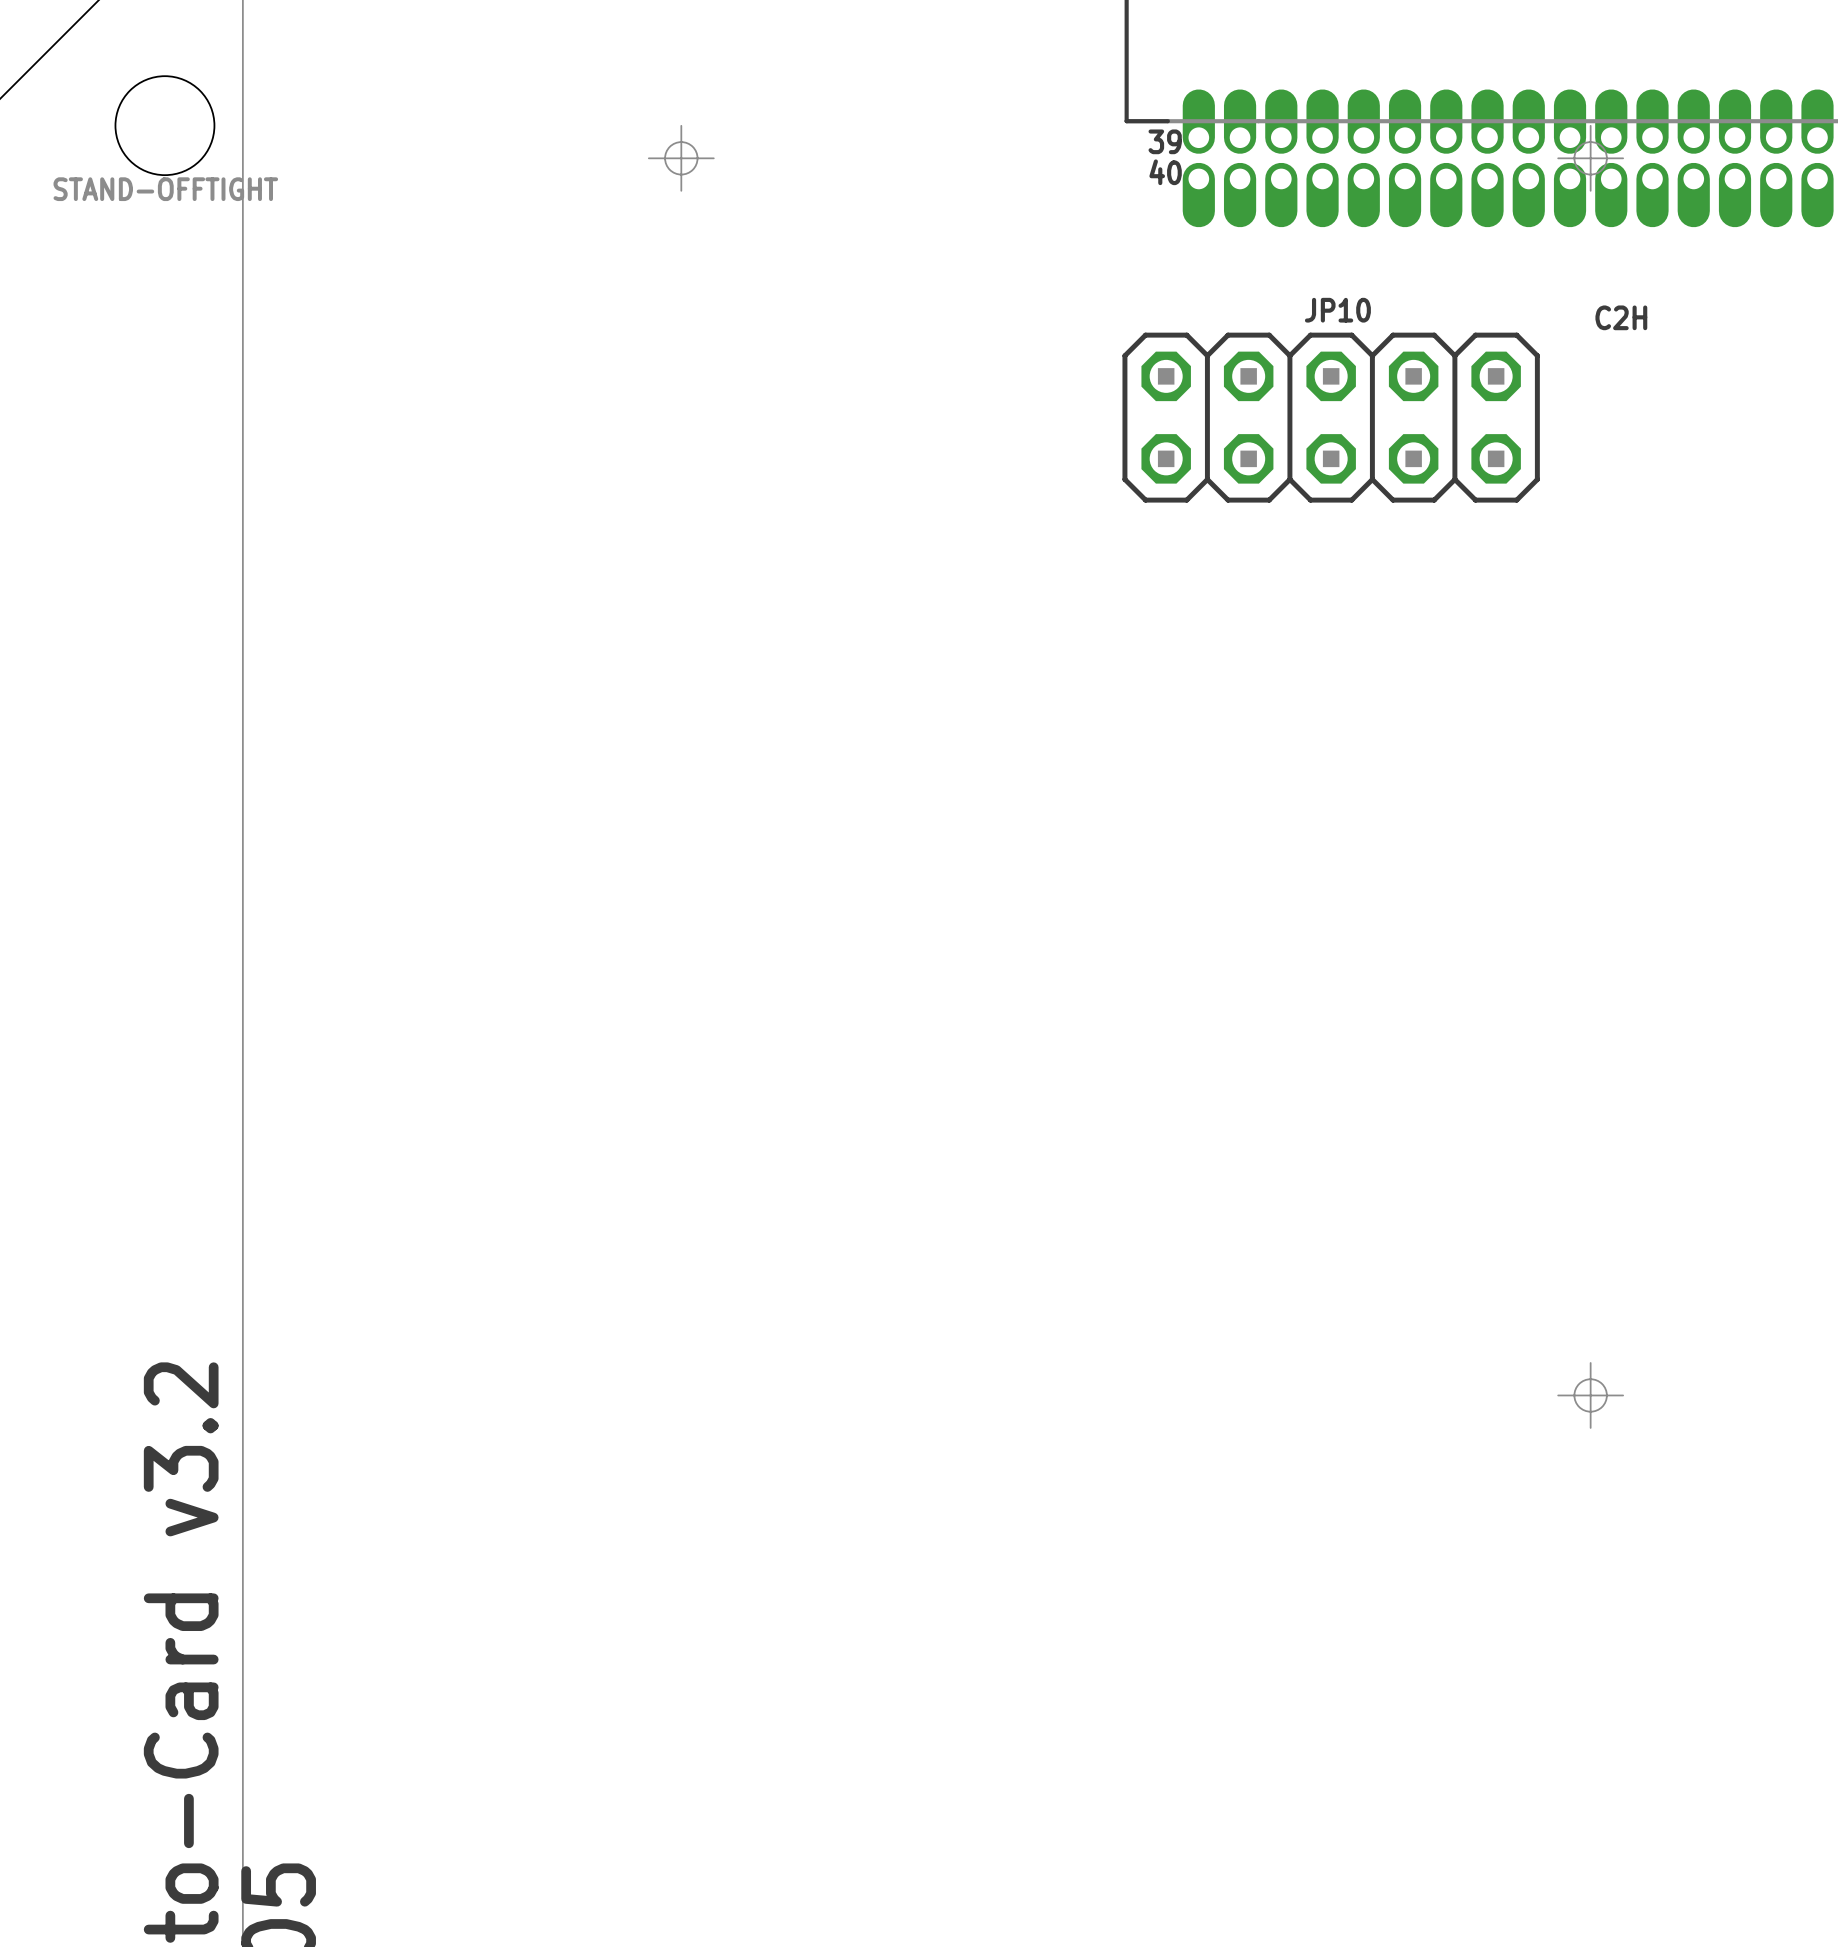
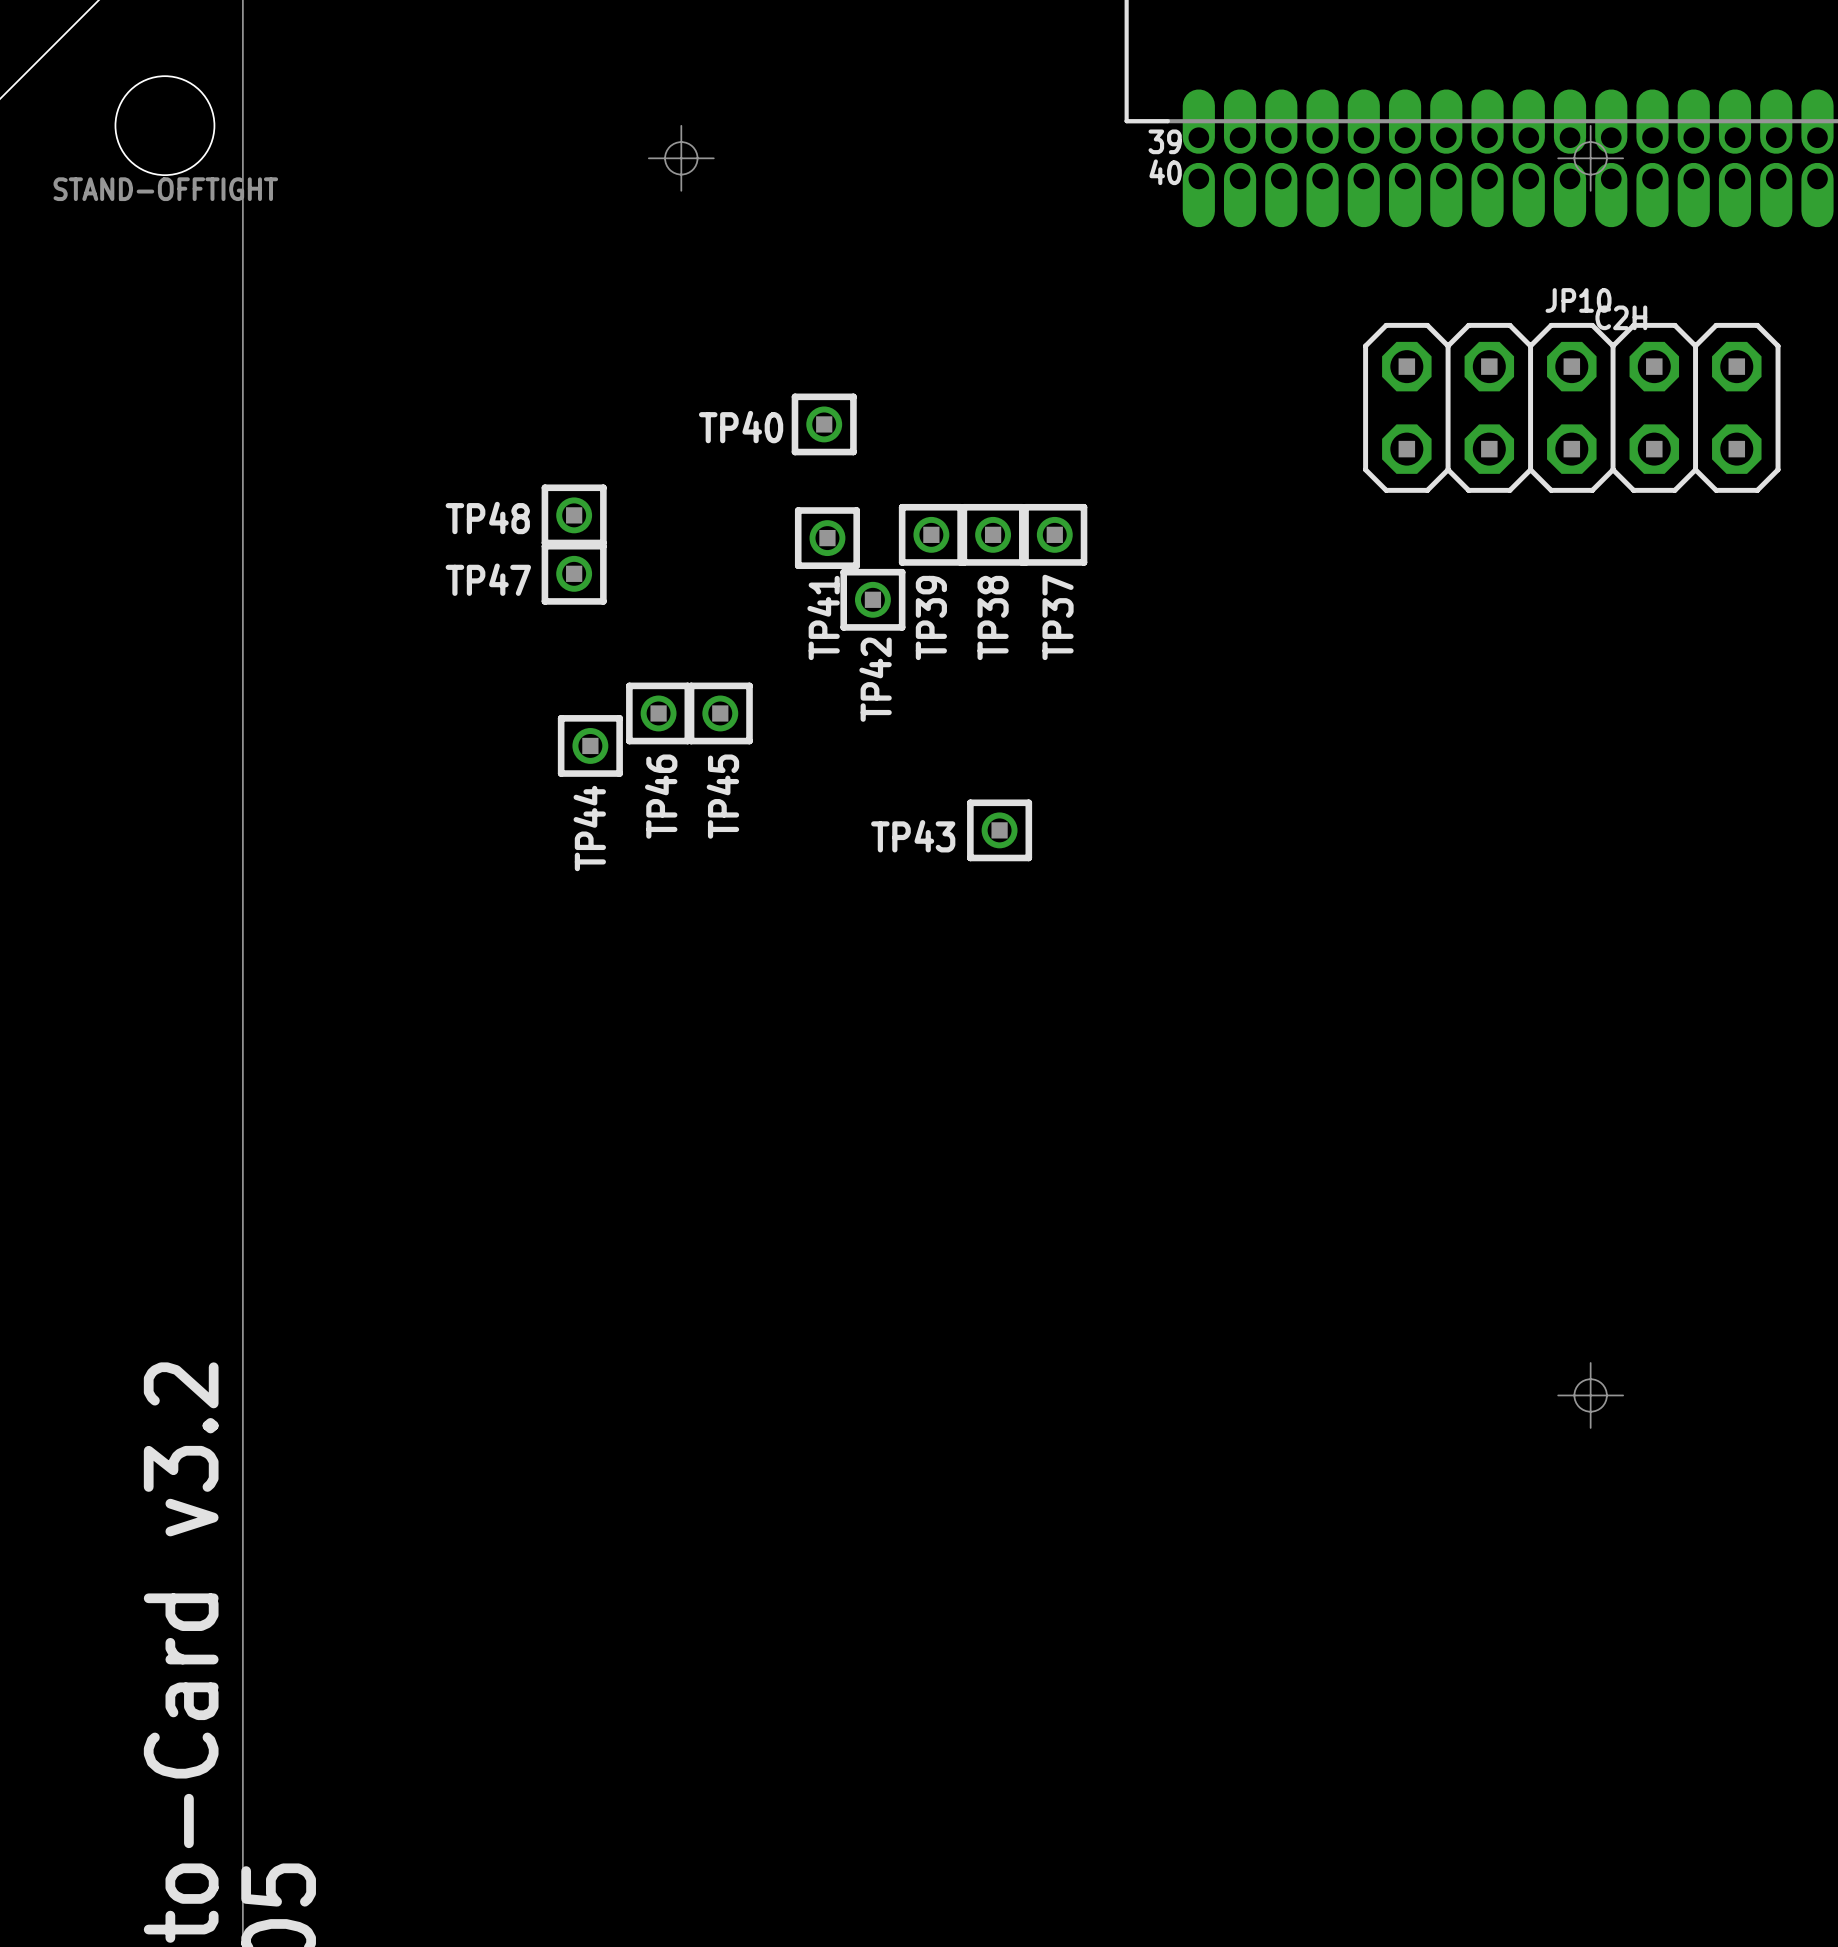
JP10 position: (1331, 417) -> (1571, 407)
TP40: none -> (824, 424)
TP48: none -> (574, 515)
TP39: none -> (931, 534)
TP38: none -> (993, 534)
TP37: none -> (1054, 534)
TP41: none -> (827, 538)
TP47: none -> (574, 573)
TP42: none -> (872, 599)
TP46: none -> (658, 713)
TP45: none -> (720, 713)
TP44: none -> (590, 745)
TP43: none -> (999, 830)

